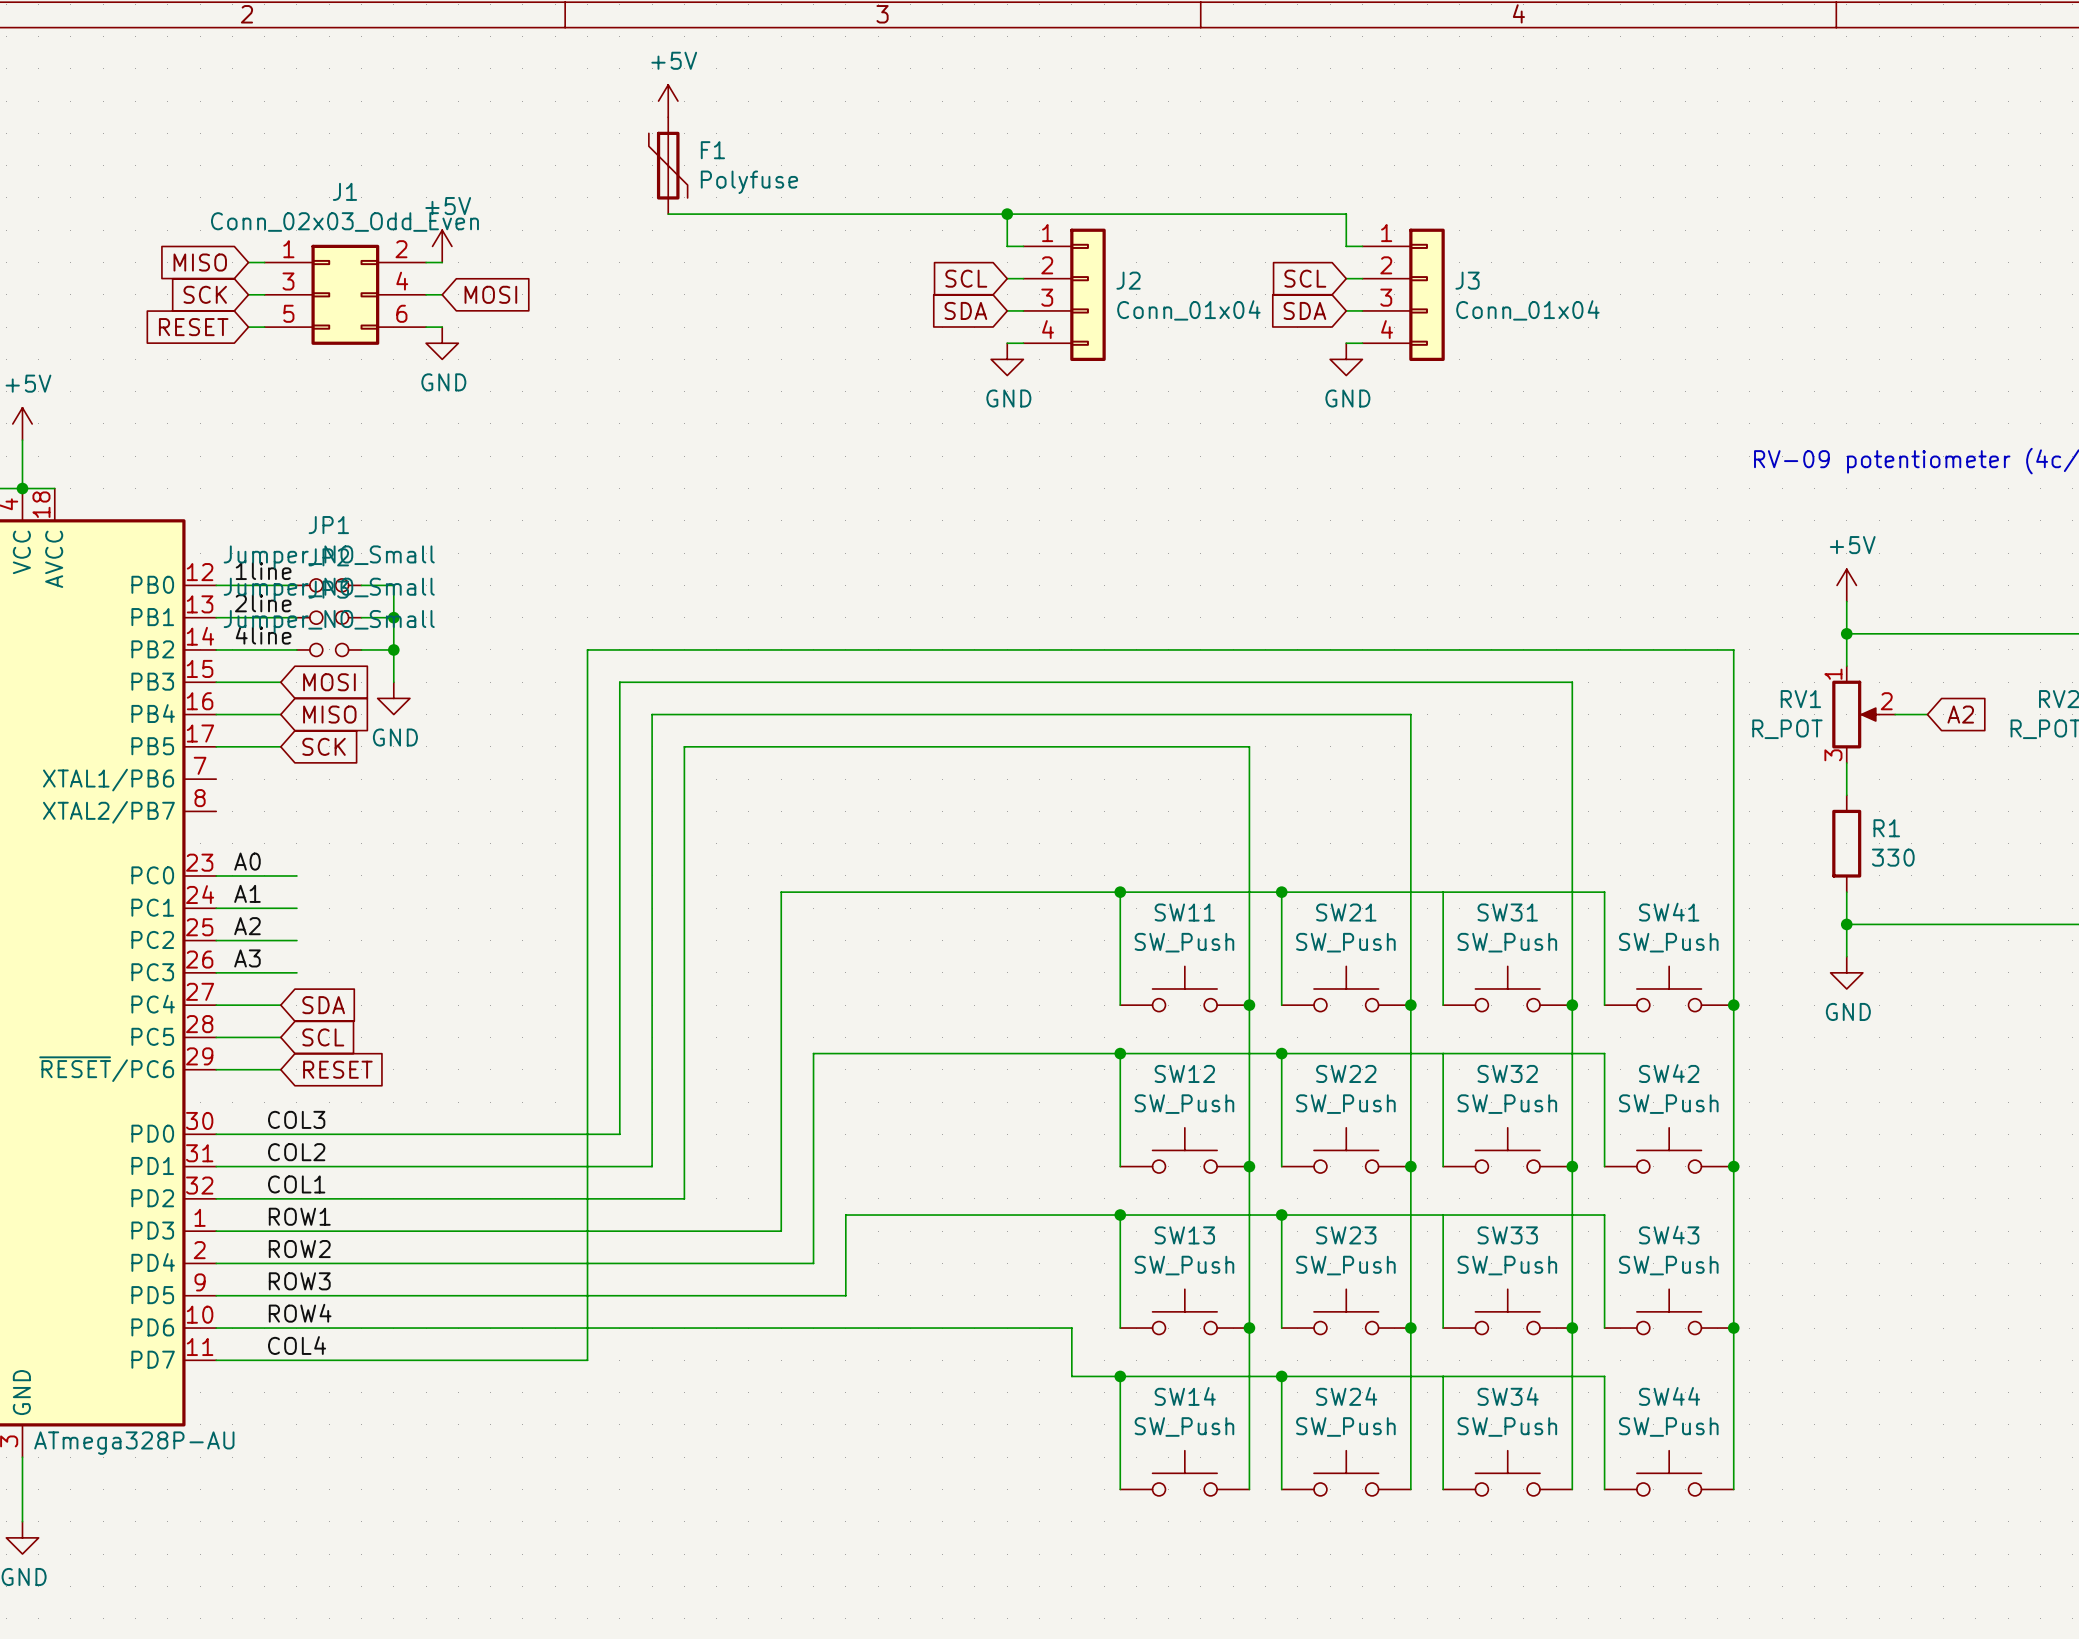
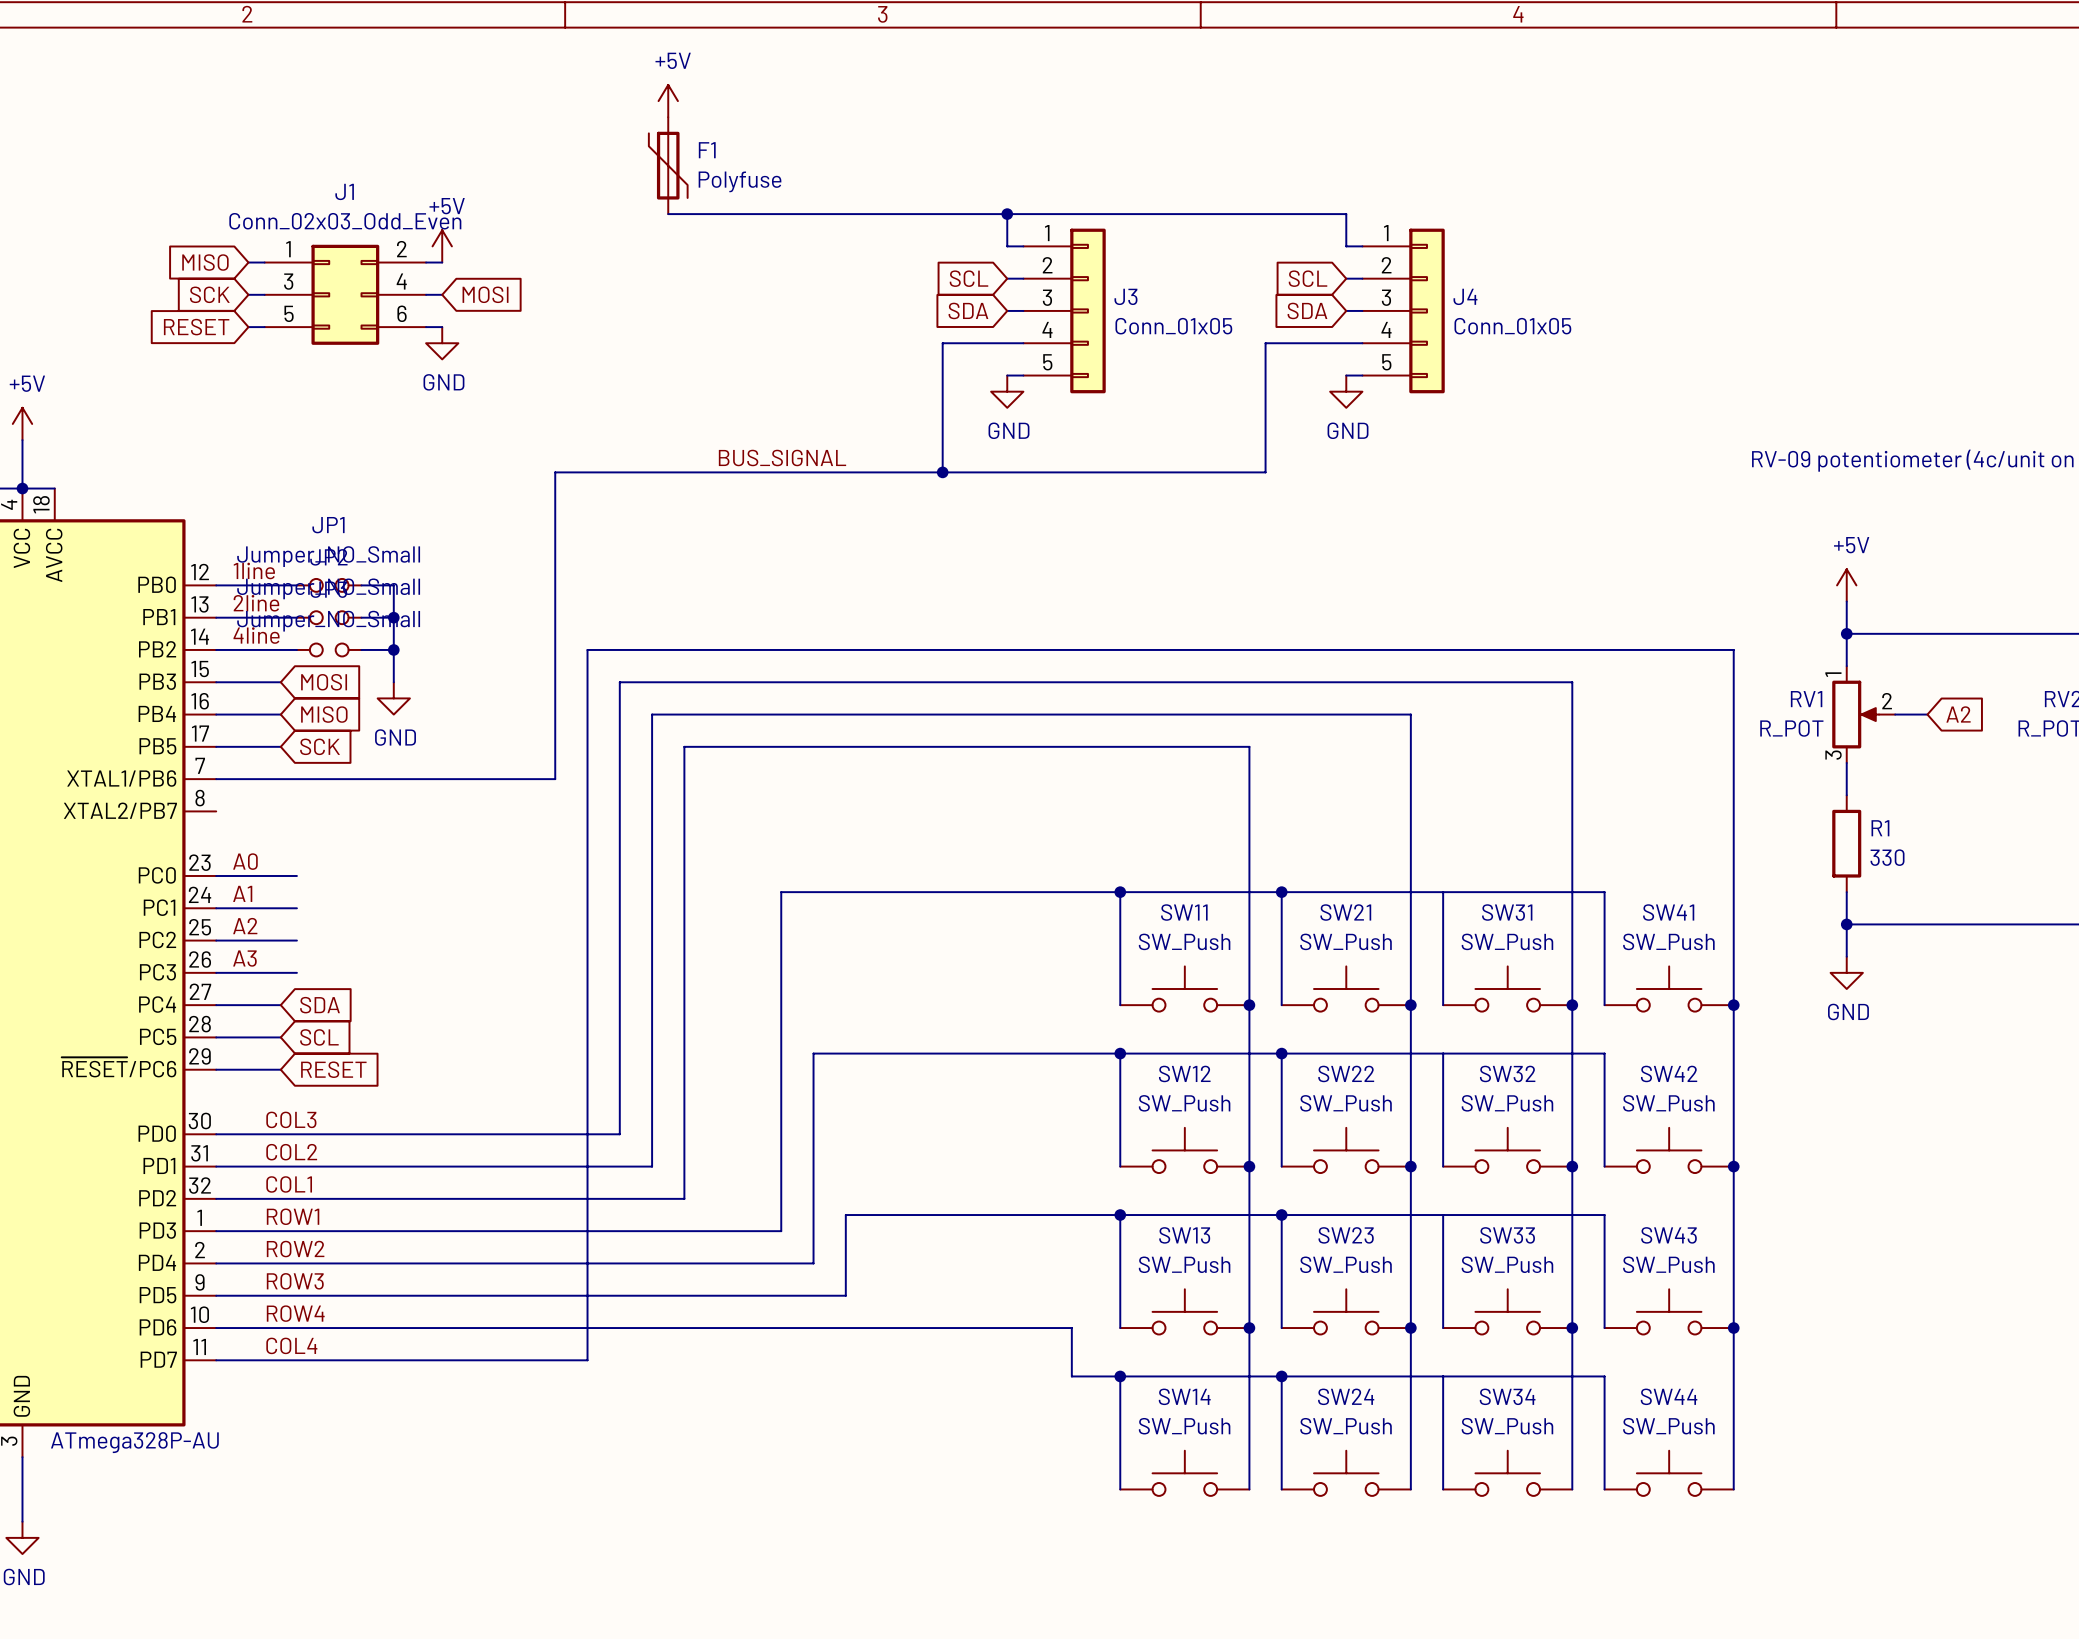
J3 symbol: [1362, 228, 1445, 362] -> [1023, 228, 1106, 394]
J2: Conn_01x04 (1064, 294) -> none
J4: none -> Conn_01x05 (1403, 310)
J3 value: Conn_01x04 (1527, 310) -> Conn_01x05 (1173, 326)
wire: none -> (1007, 343) (942, 343) (942, 472)
wire: none -> (1346, 343) (1265, 343) (1265, 472) (555, 472) (555, 779) (216, 779)
power symbol position: GND (1007, 359) -> GND (1007, 391)
power symbol position: GND (1346, 359) -> GND (1346, 391)
wire: none -> (1007, 375) (1023, 375)
wire: none -> (1346, 375) (1362, 375)
label: none -> BUS_SIGNAL (782, 457)
junction: none -> (942, 472)

